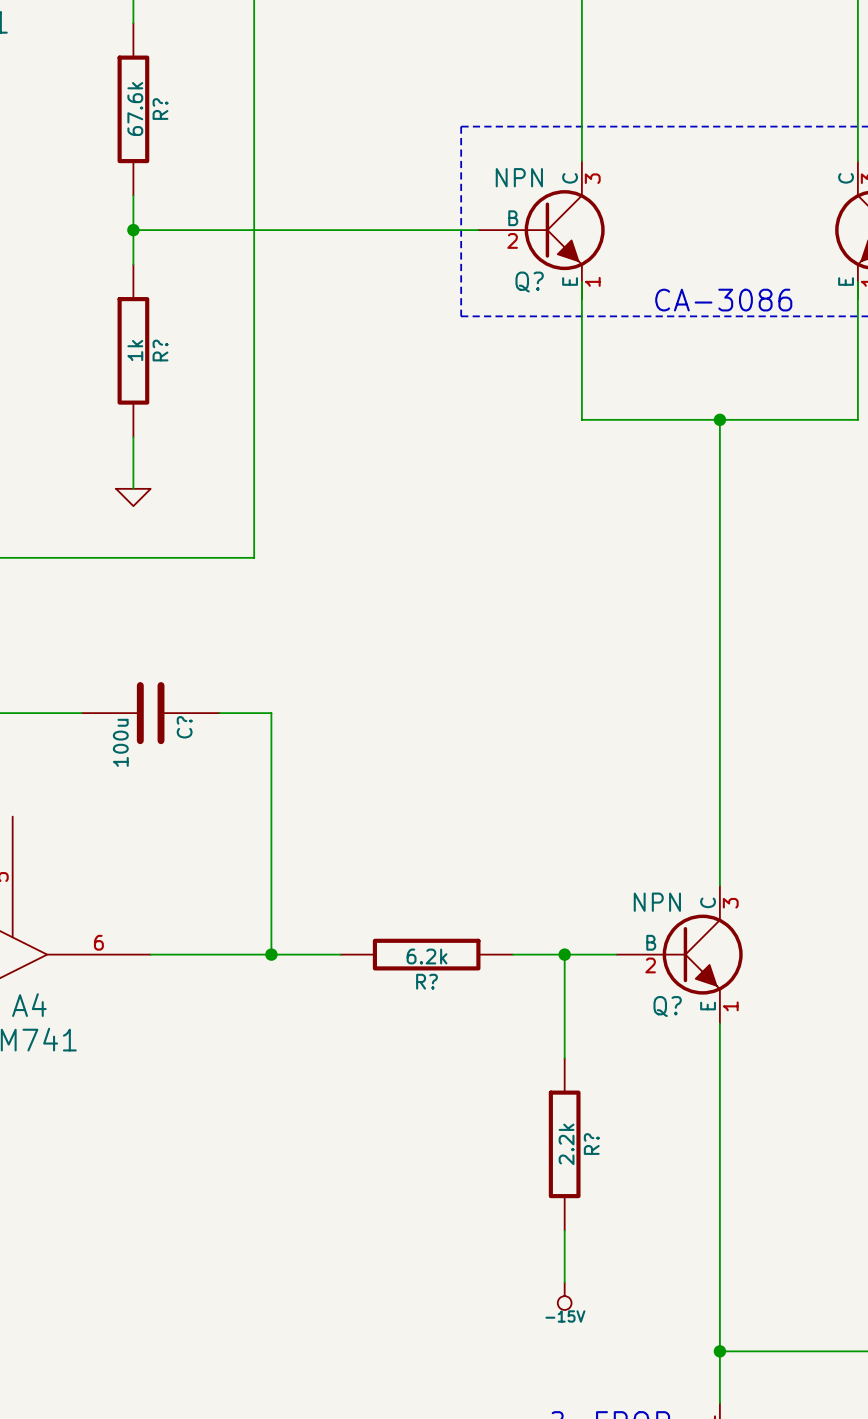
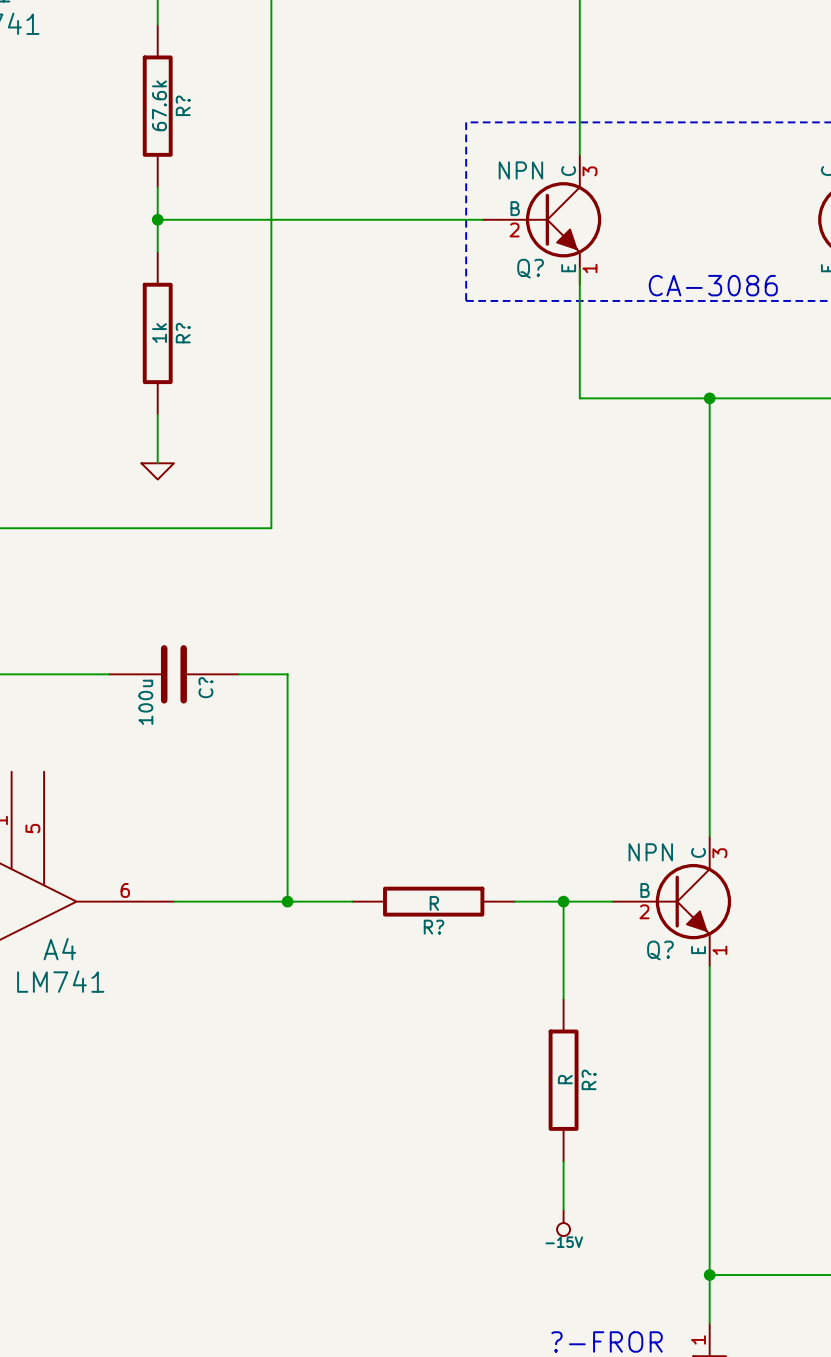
R? value: 6.2k (427, 956) -> R (434, 903)
R? value: 2.2k (566, 1144) -> R (565, 1079)

